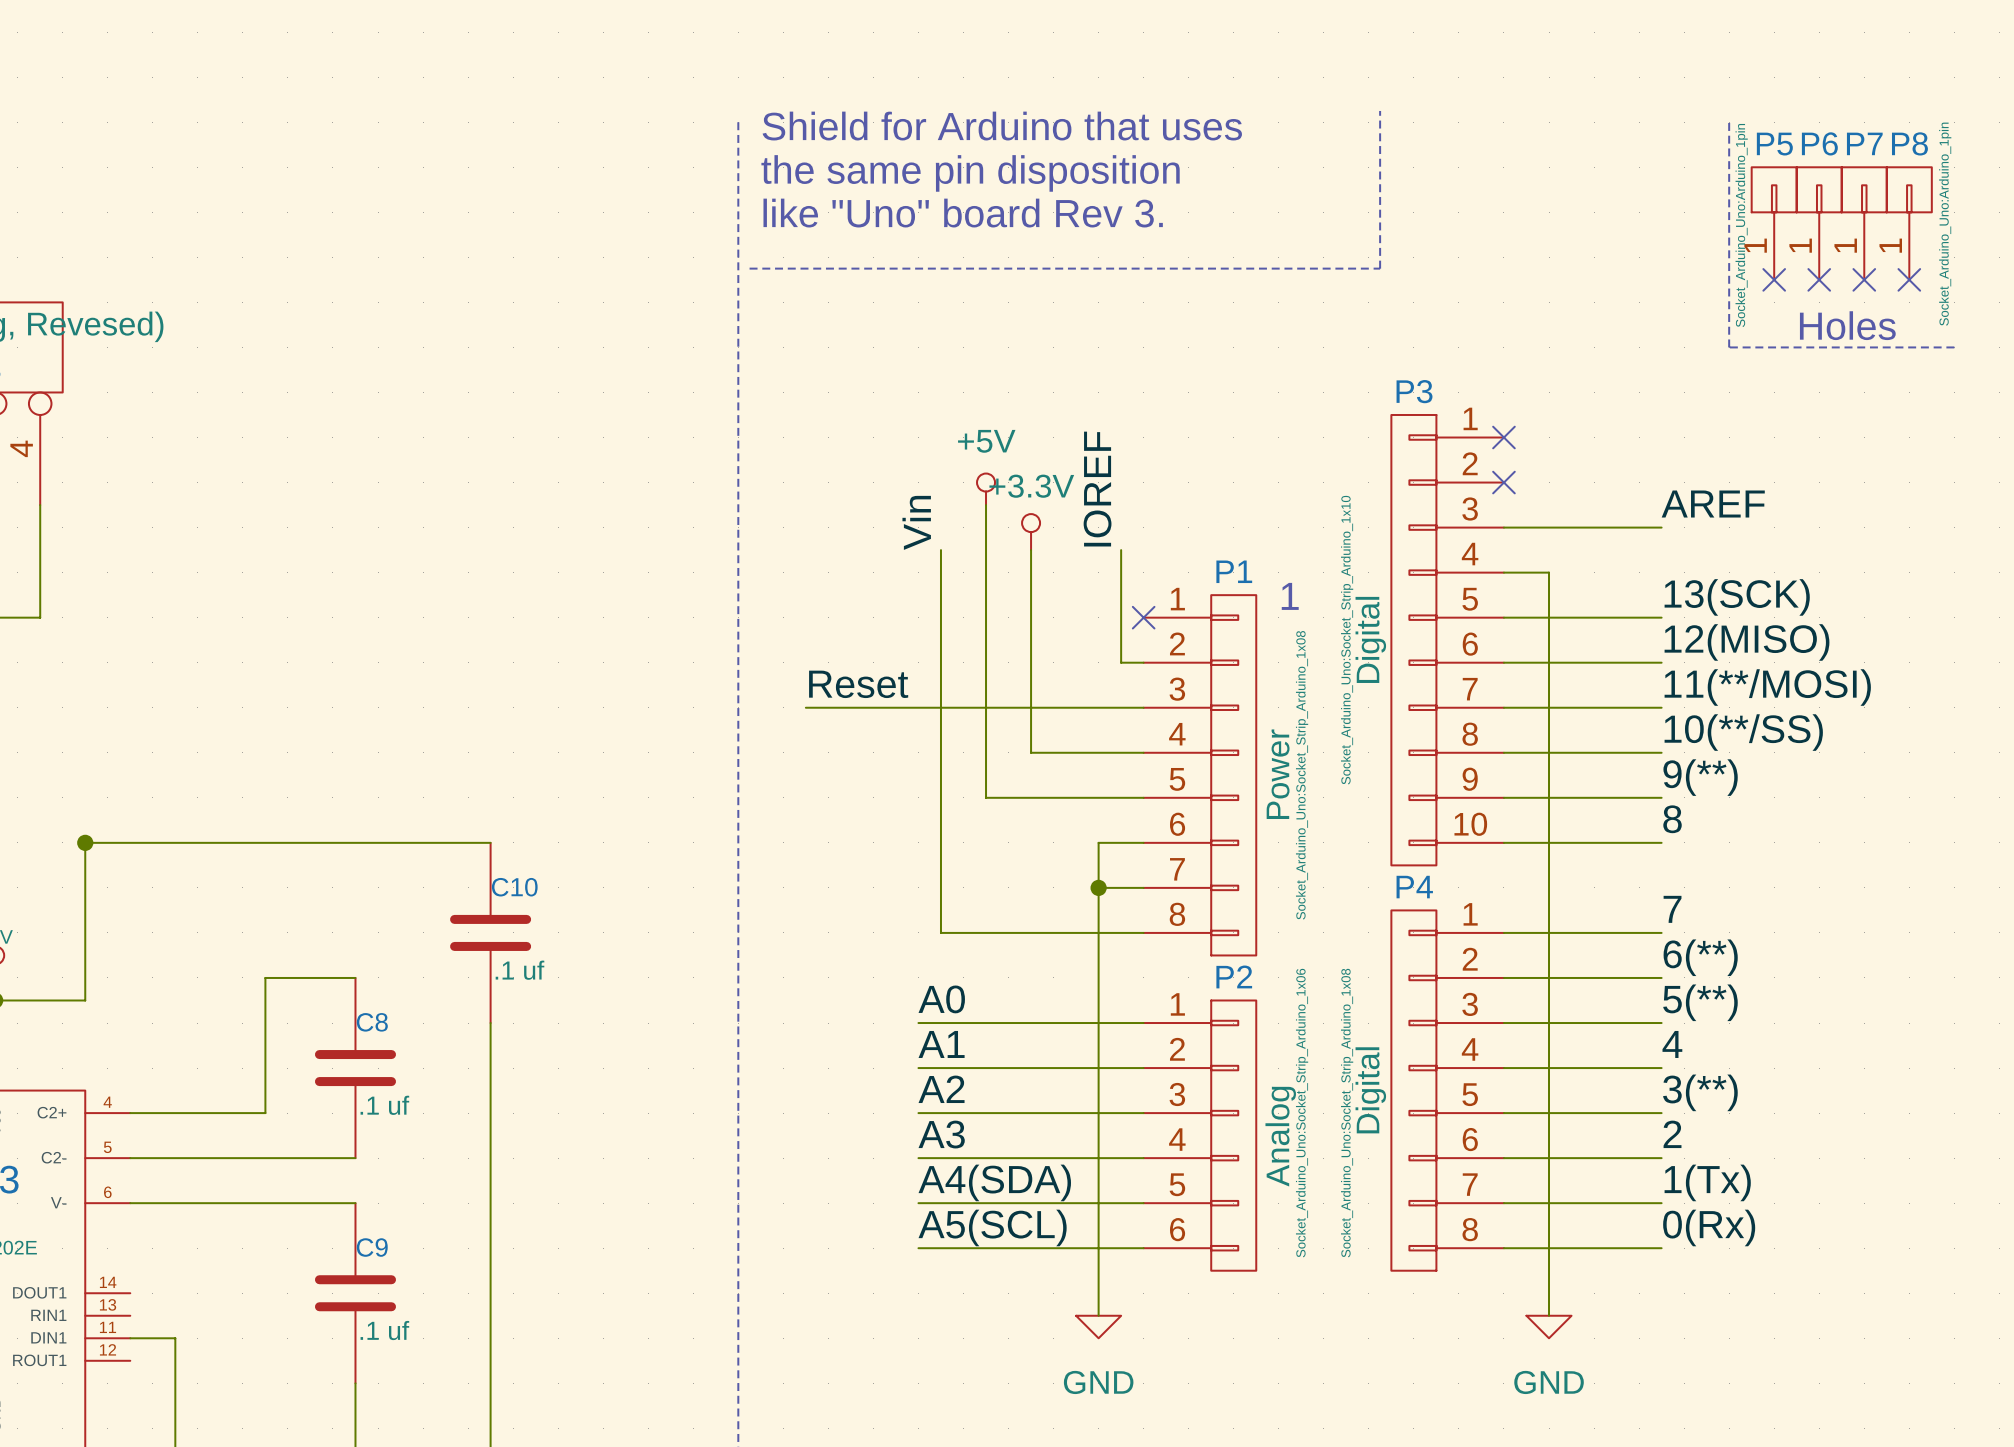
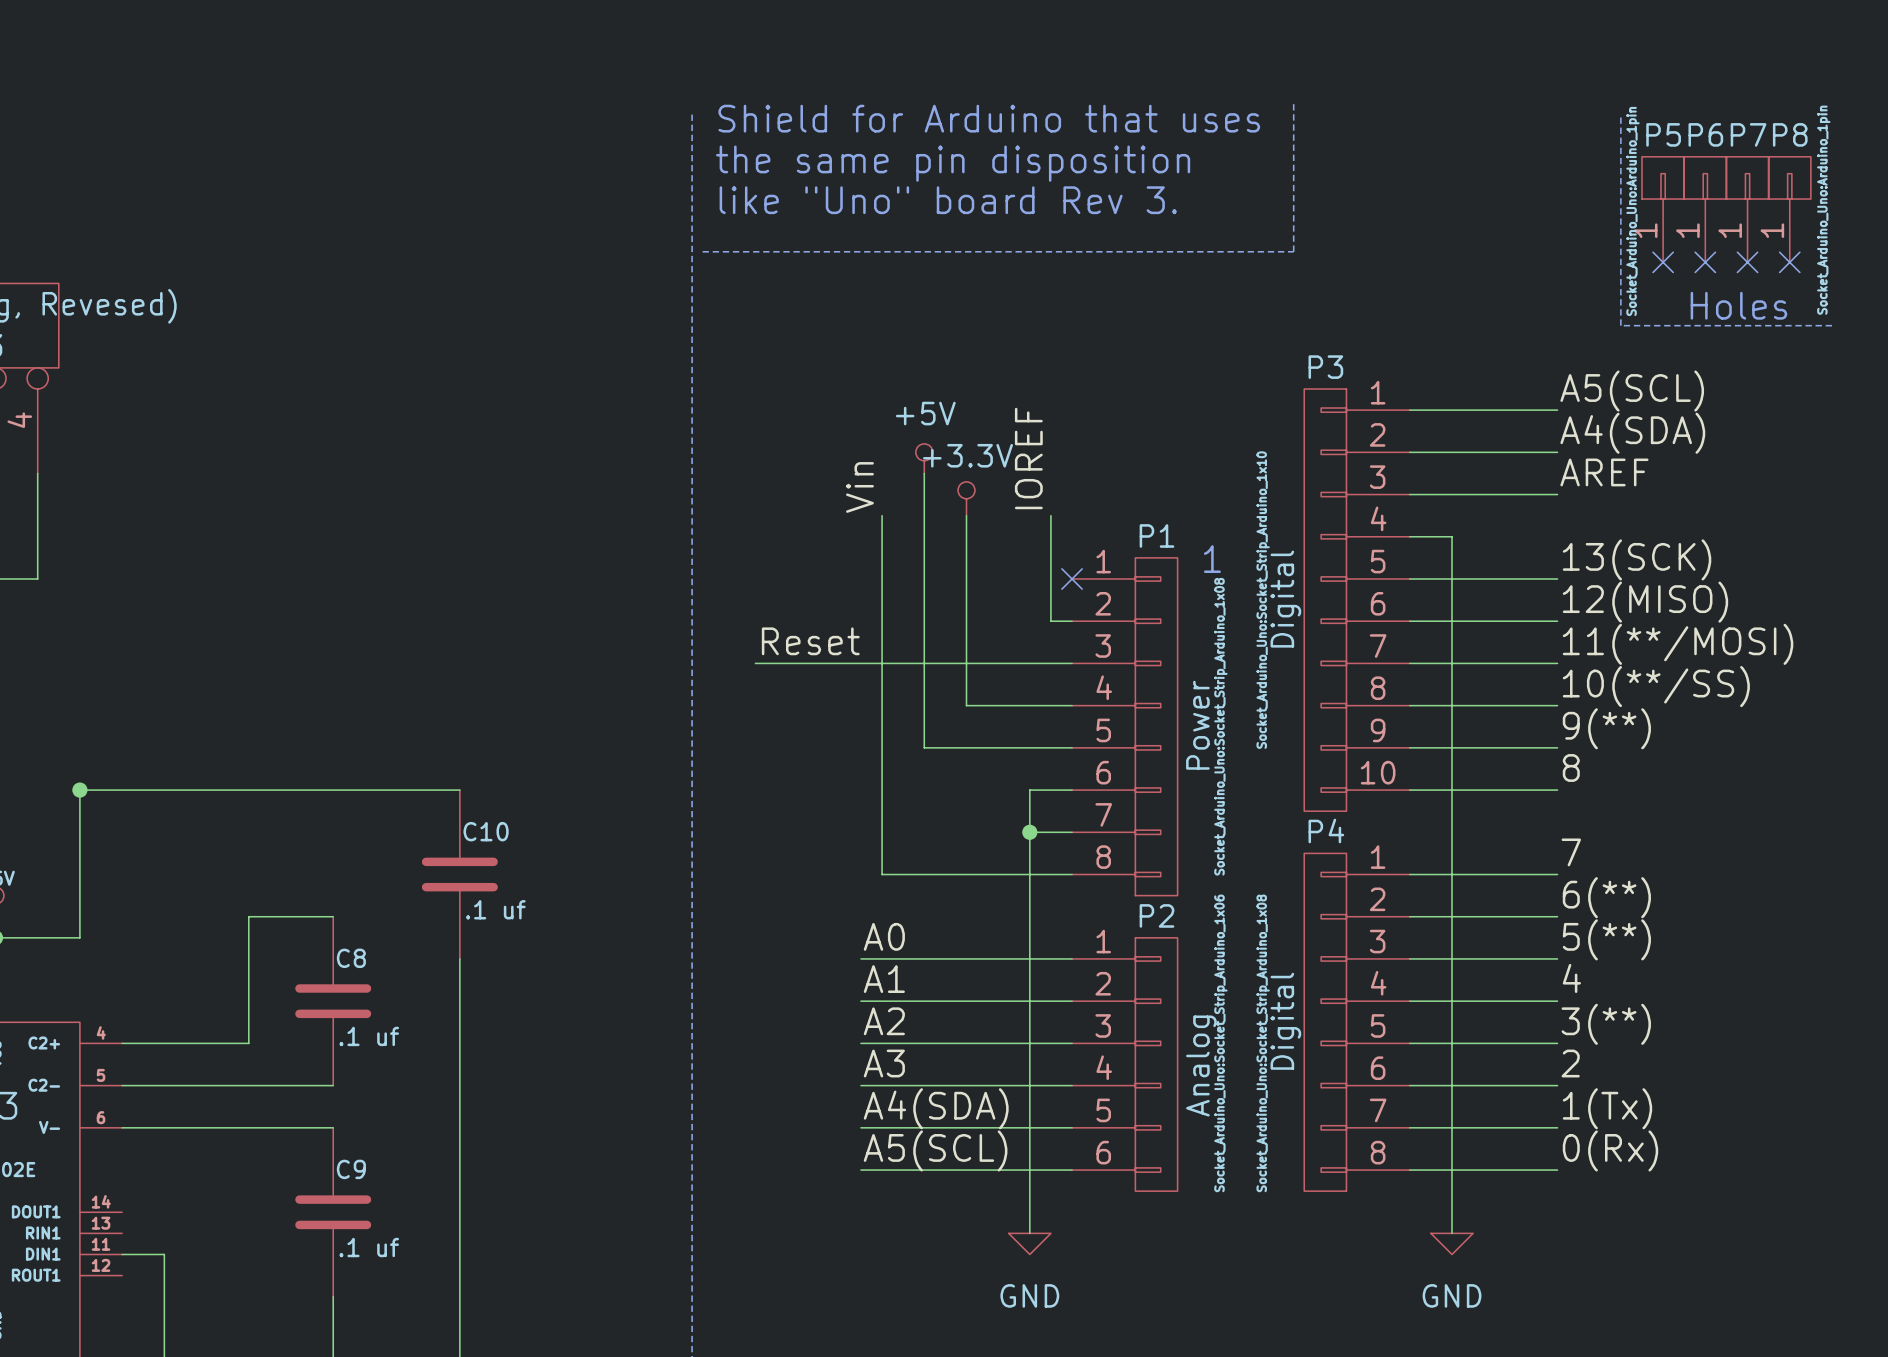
label: none -> A5(SCL) (1632, 391)
wire: none -> (1409, 410) (1557, 410)
no-connect mark: (1503, 437) -> none
label: none -> A4(SDA) (1632, 433)
wire: none -> (1409, 452) (1557, 452)
no-connect mark: (1503, 482) -> none

